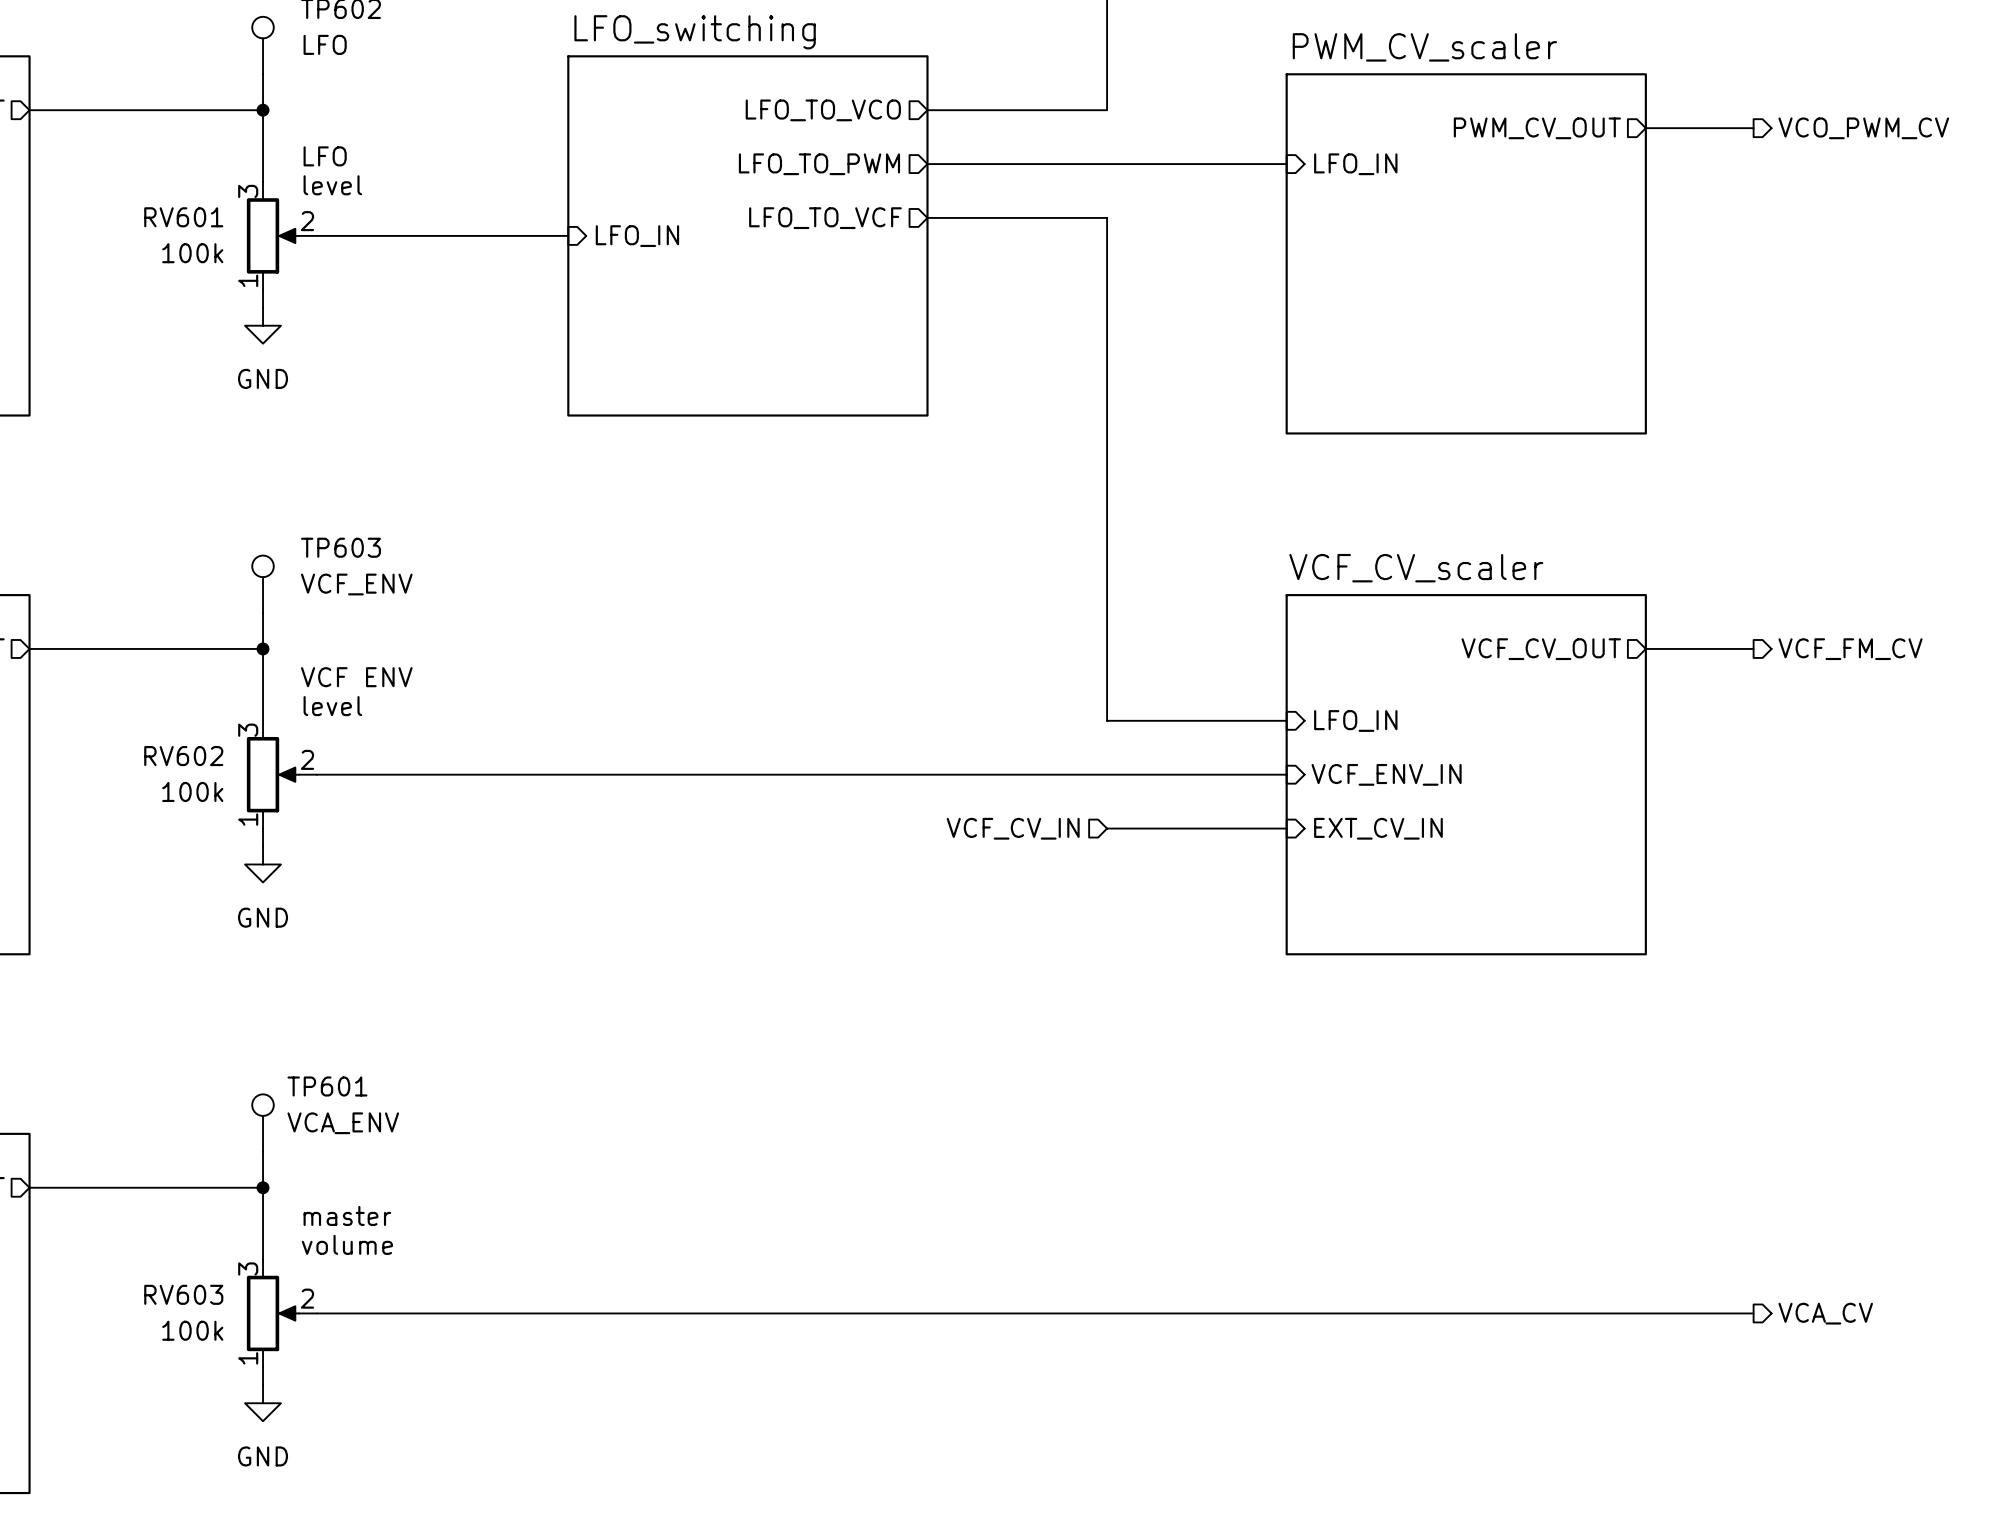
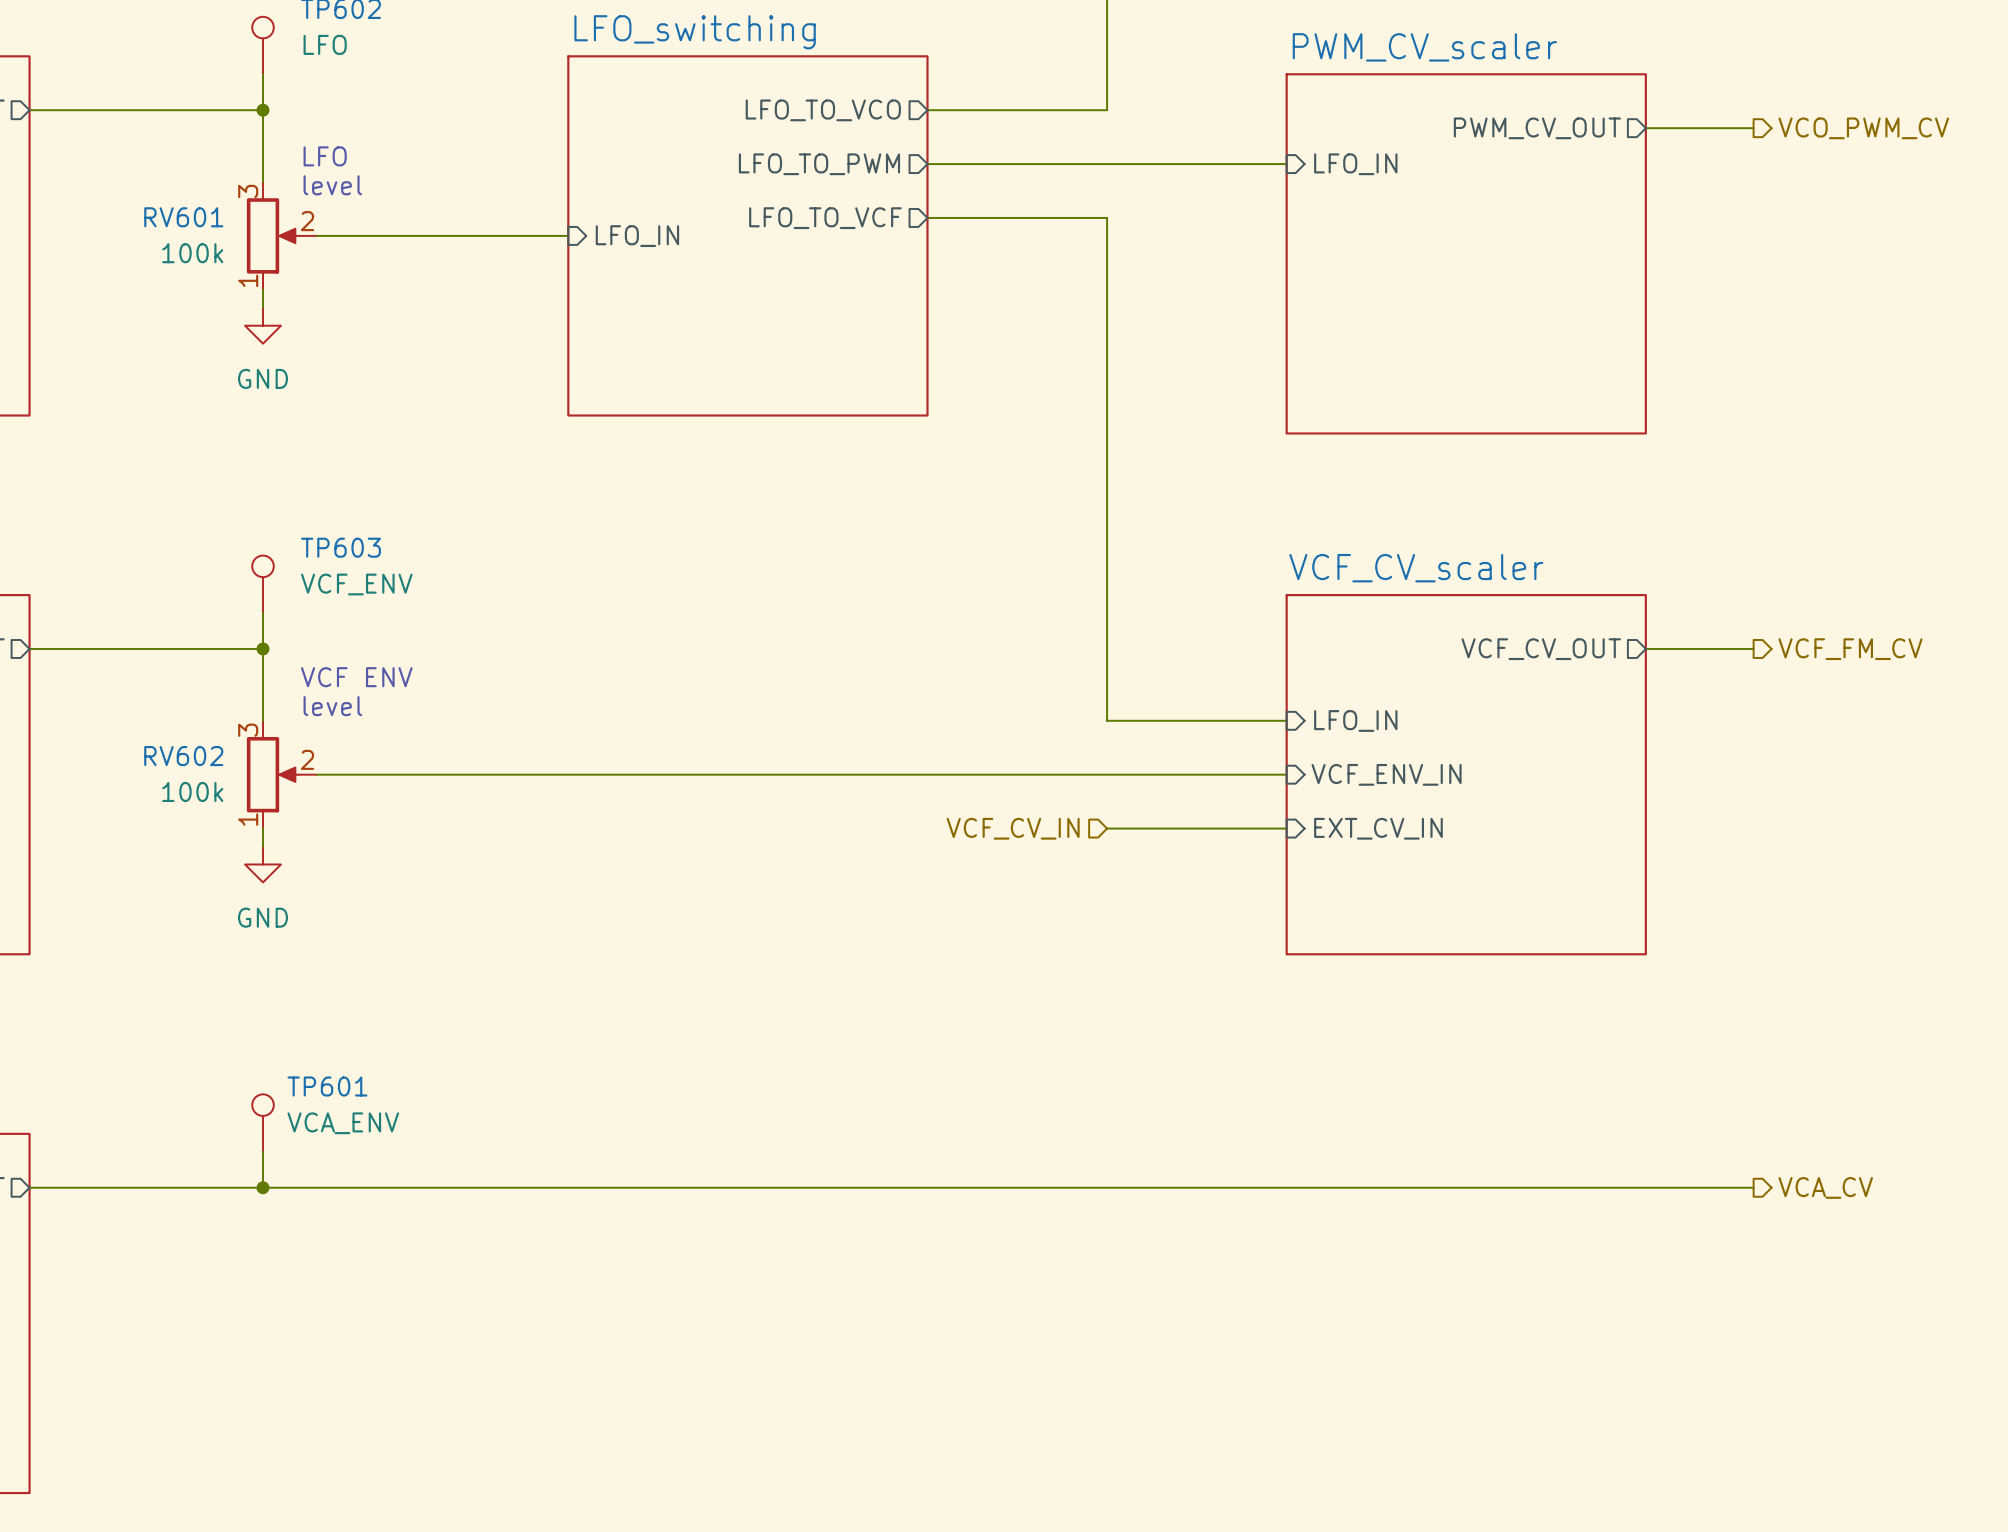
wire: (263, 1187) (263, 1259) -> (263, 1187) (1753, 1187)
text: master (347, 1215) -> none
text: volume (347, 1244) -> none
RV603: 100k (281, 1313) -> none
wire: (316, 1313) (1753, 1313) -> none
hierarchical label position: VCA_CV (1825, 1313) -> VCA_CV (1825, 1187)
wire: (263, 1367) (263, 1385) -> none
power symbol: GND (263, 1403) -> none

